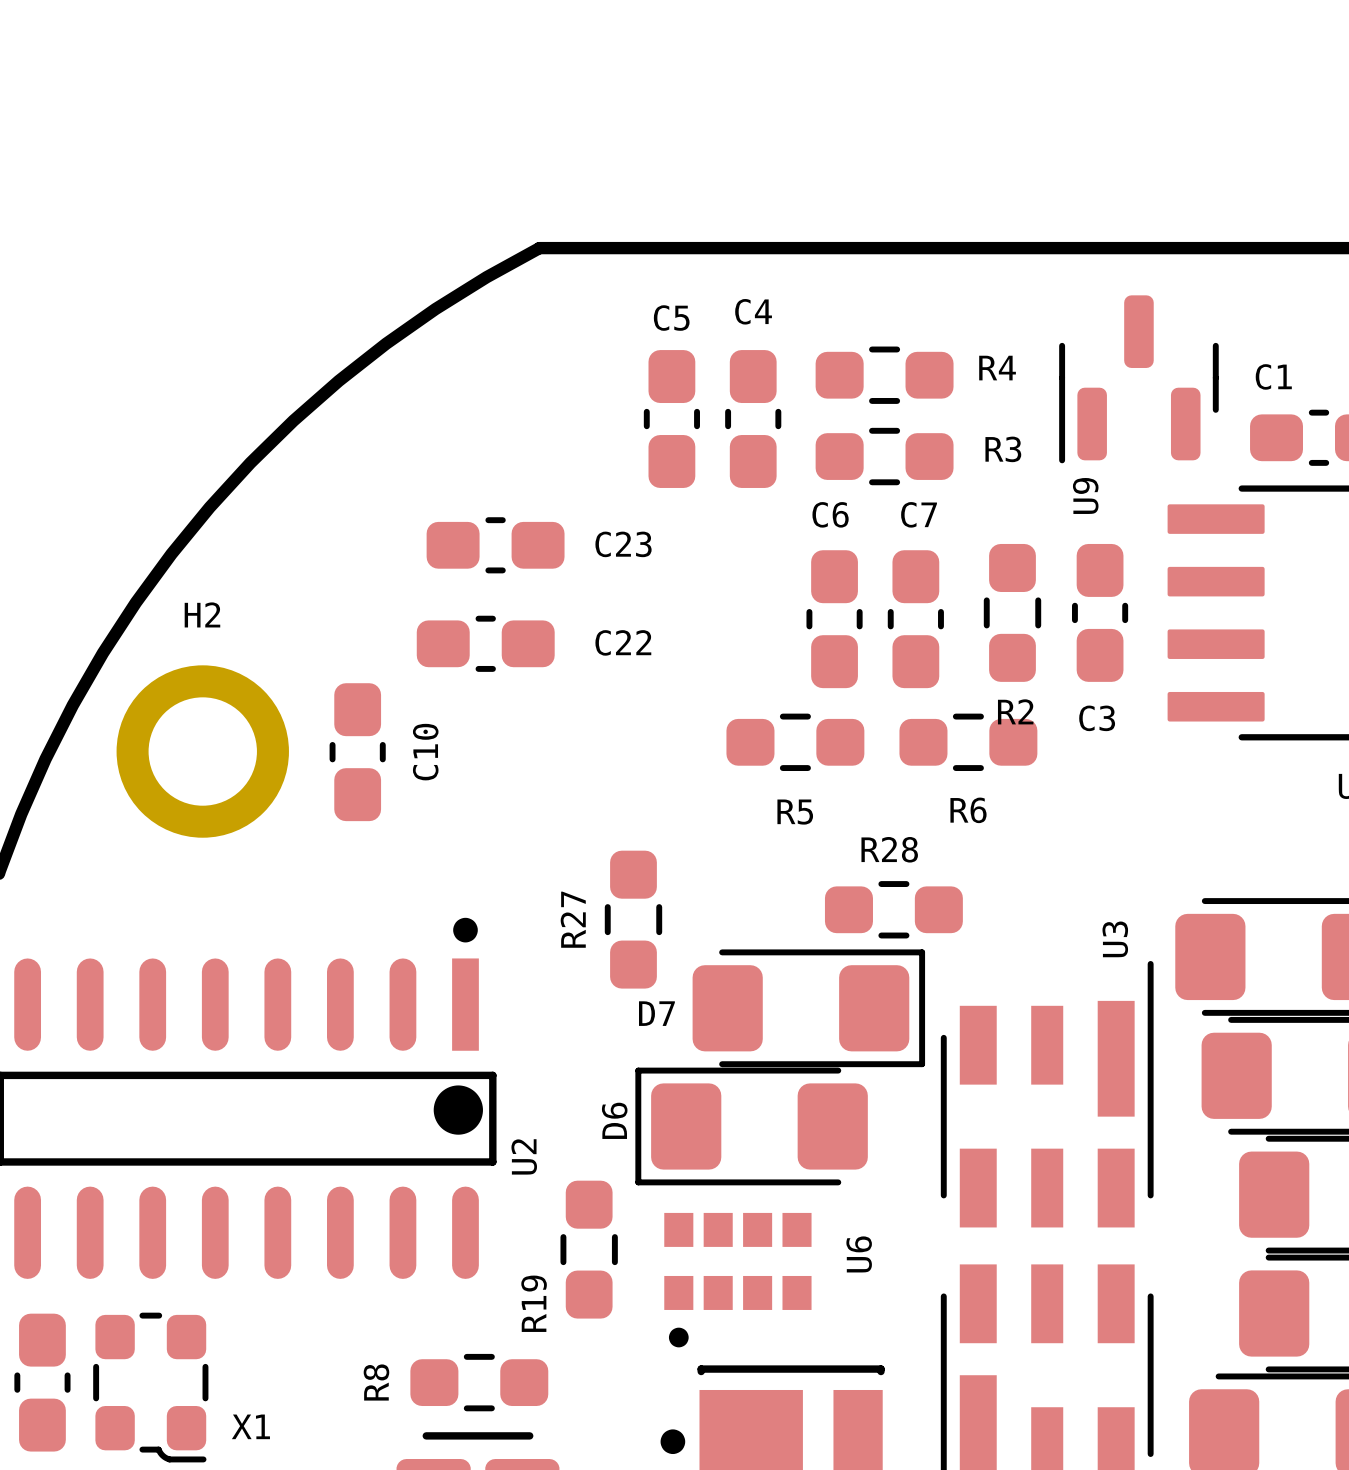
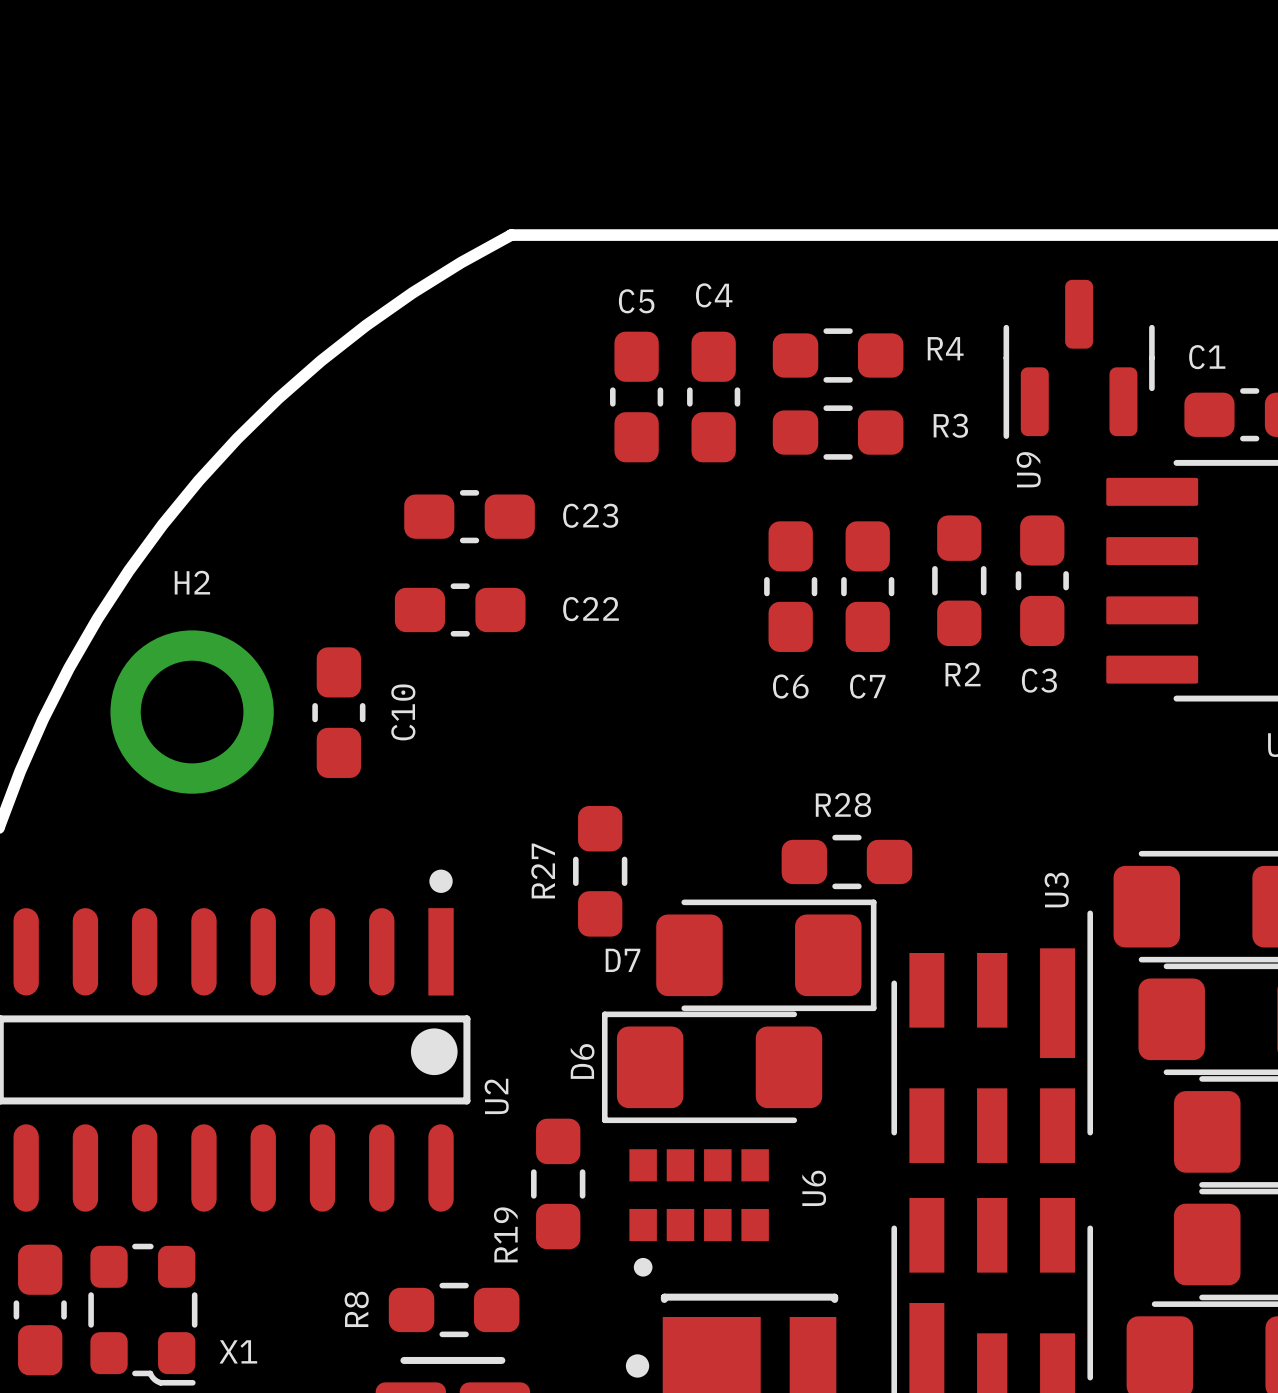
C6 name position: C6 (830, 514) -> C6 (790, 686)
C7 name position: C7 (919, 514) -> C7 (867, 686)
R5: (795, 742) -> none
R6: (968, 742) -> none

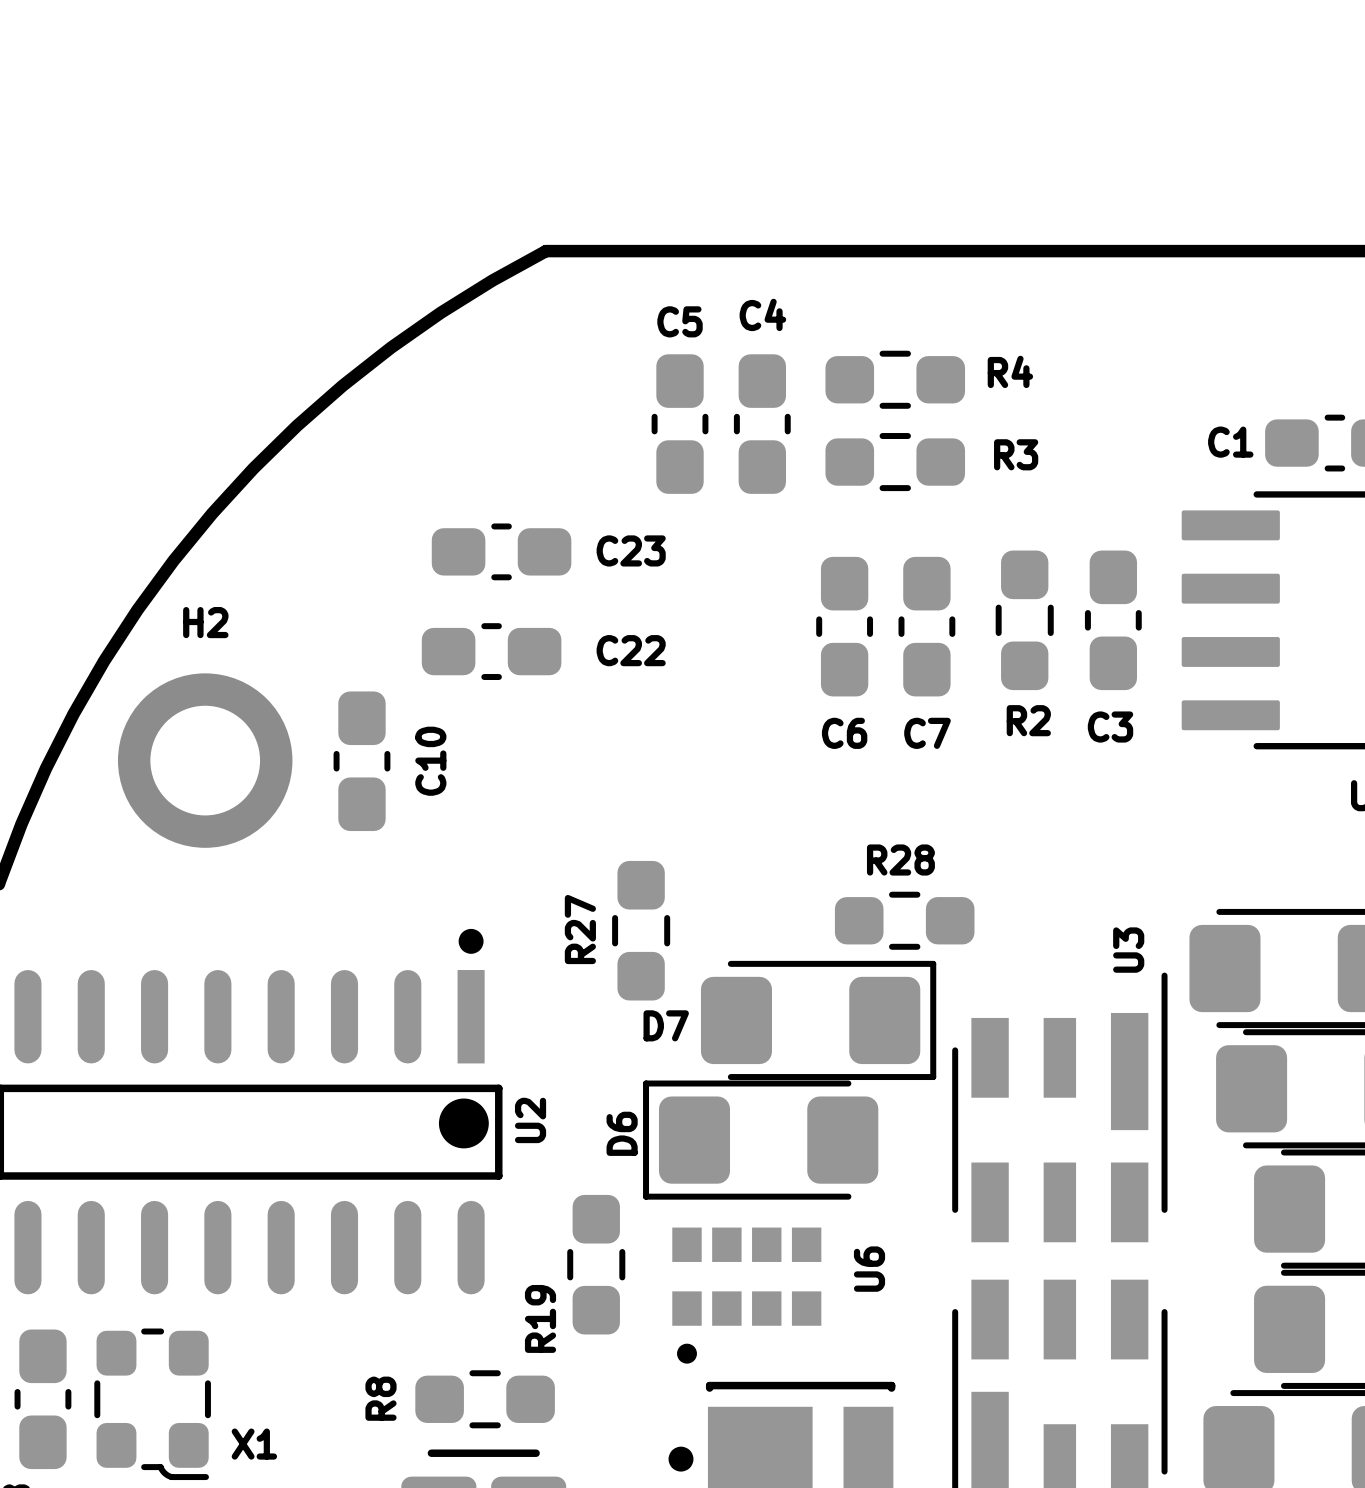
C1 name position: C1 (1207, 357) -> C1 (1230, 442)
U9: (1079, 359) -> none
U2 name position: U2 (496, 1096) -> U2 (530, 1120)

